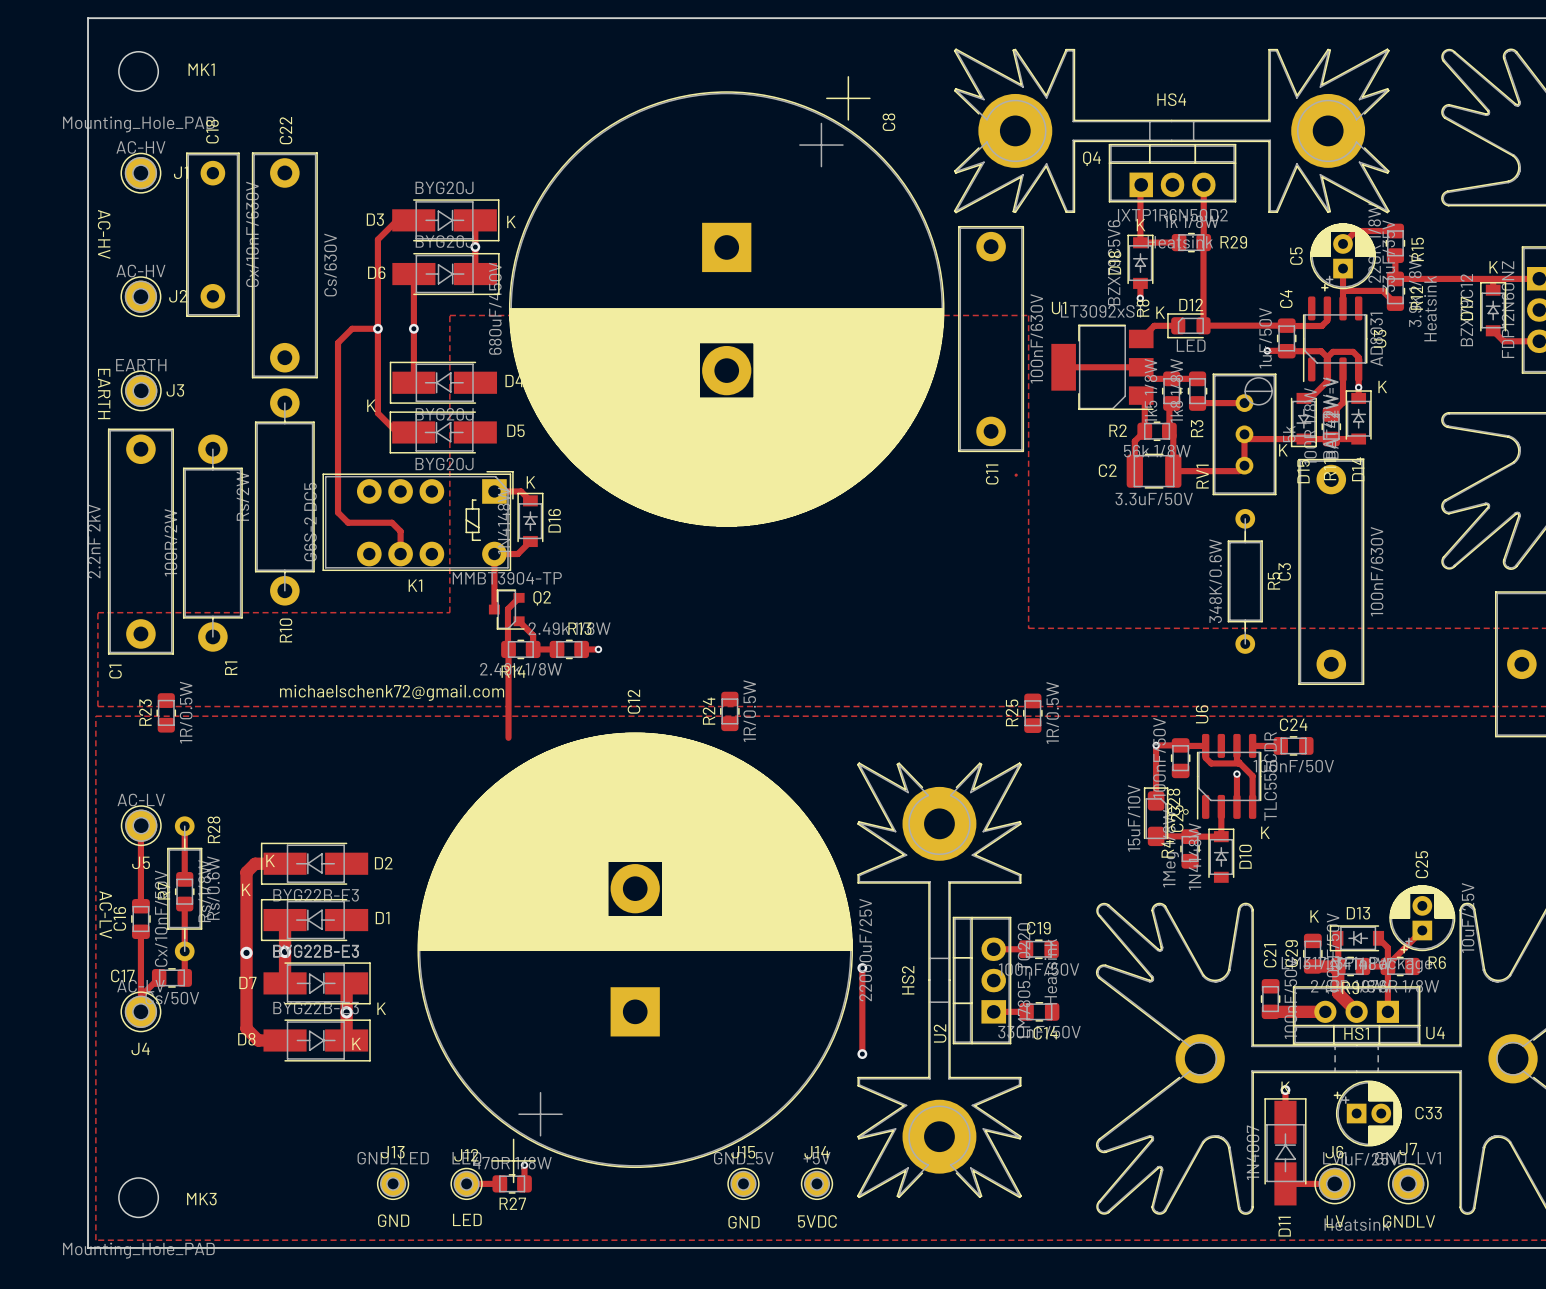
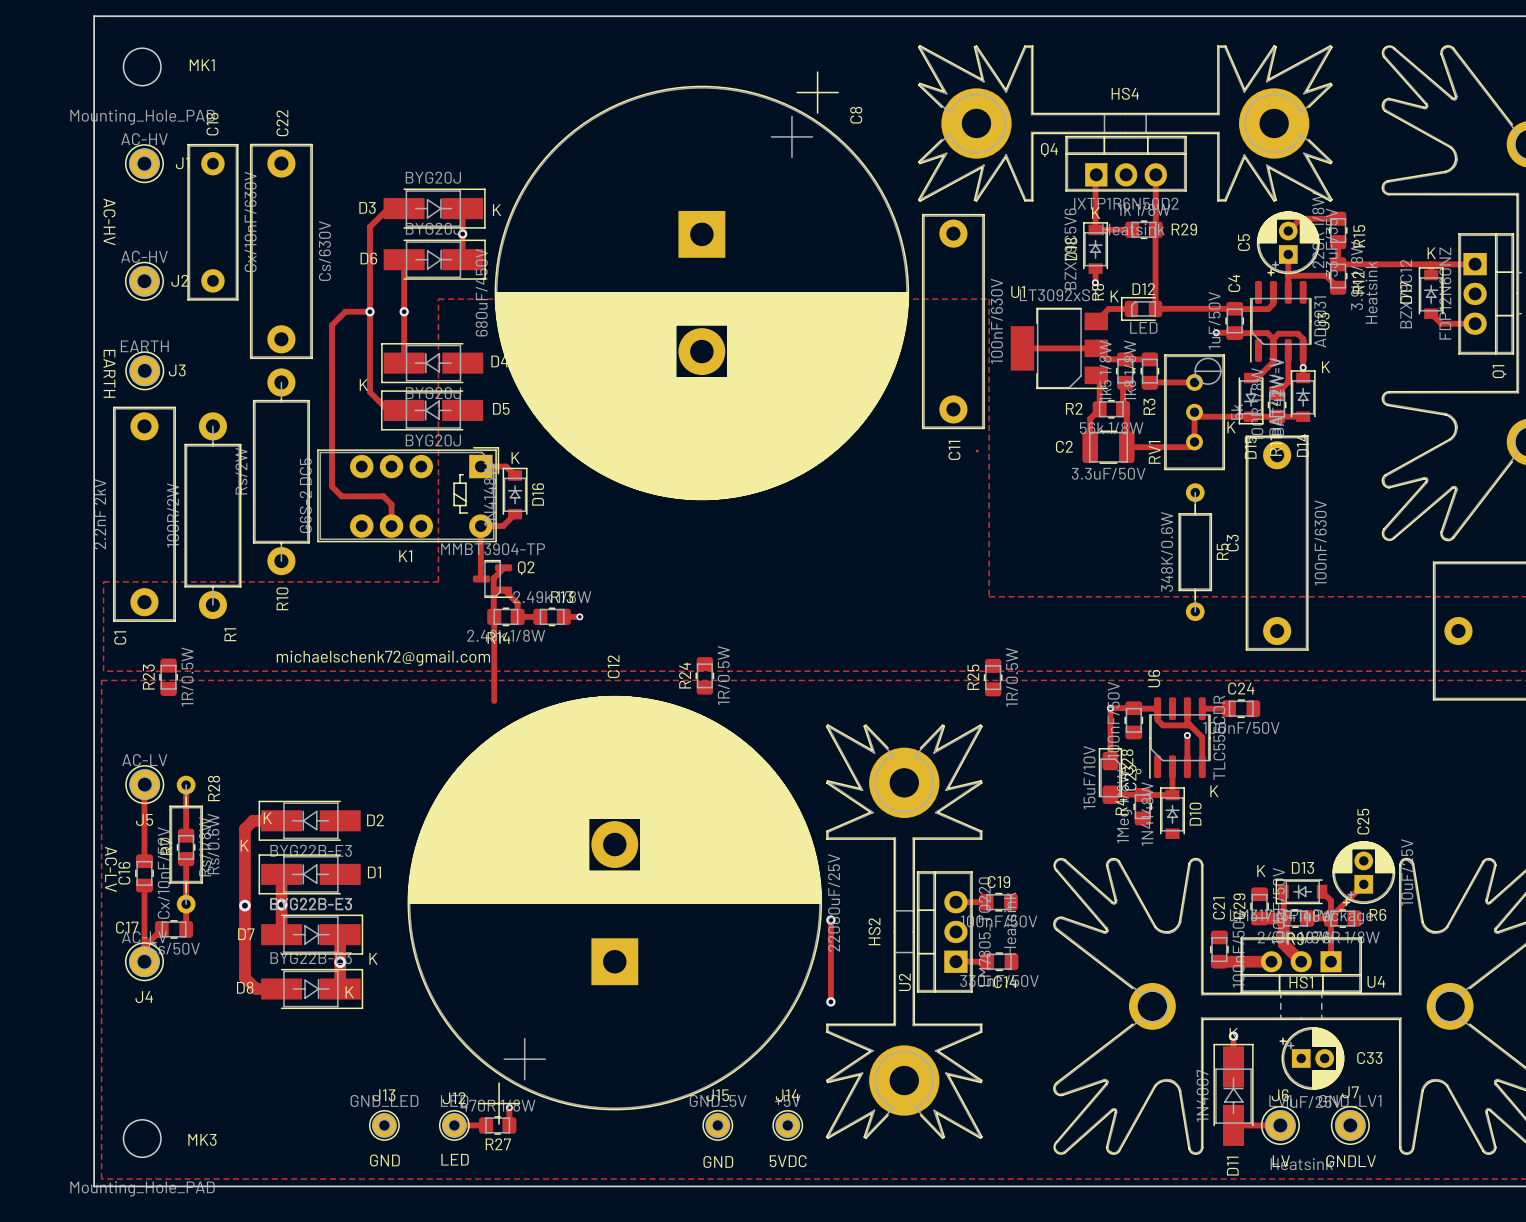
Q2 footprint: [488, 589, 525, 630] -> [472, 559, 513, 598]

